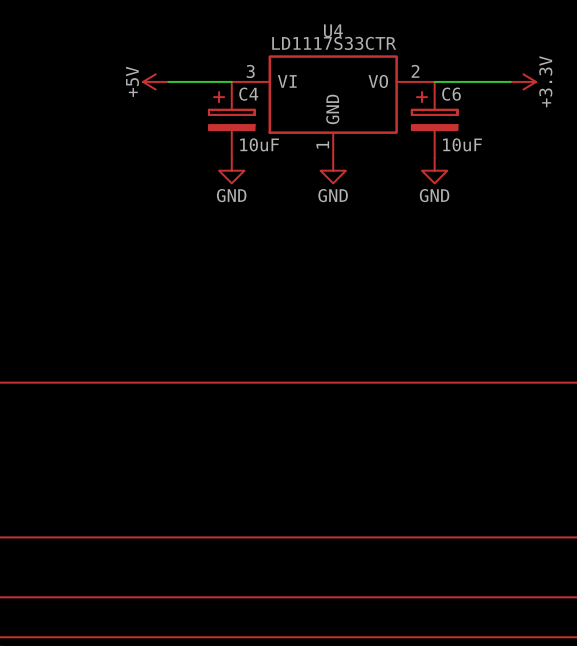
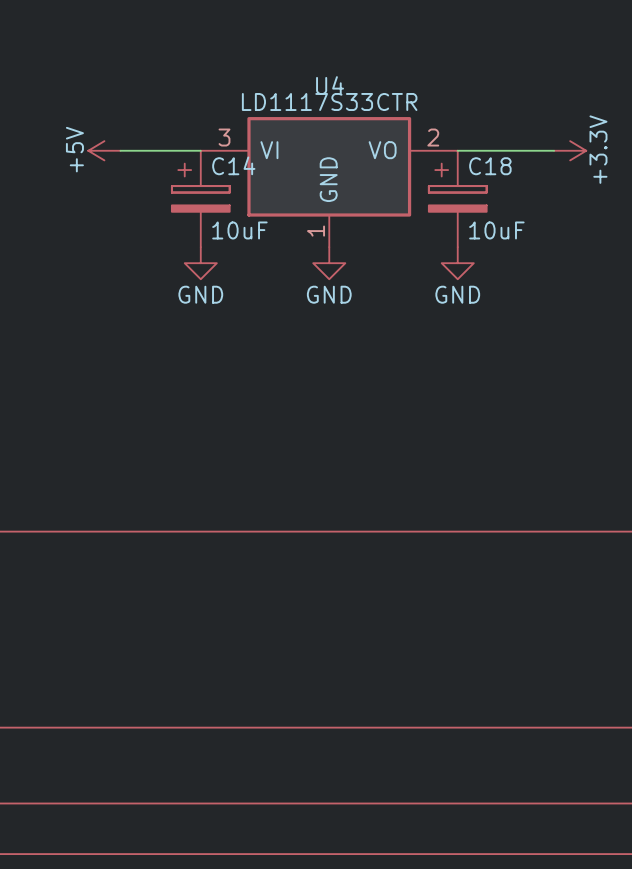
C4 name: C4 (248, 94) -> C14 (233, 165)
C6 name: C6 (451, 94) -> C18 (490, 166)

